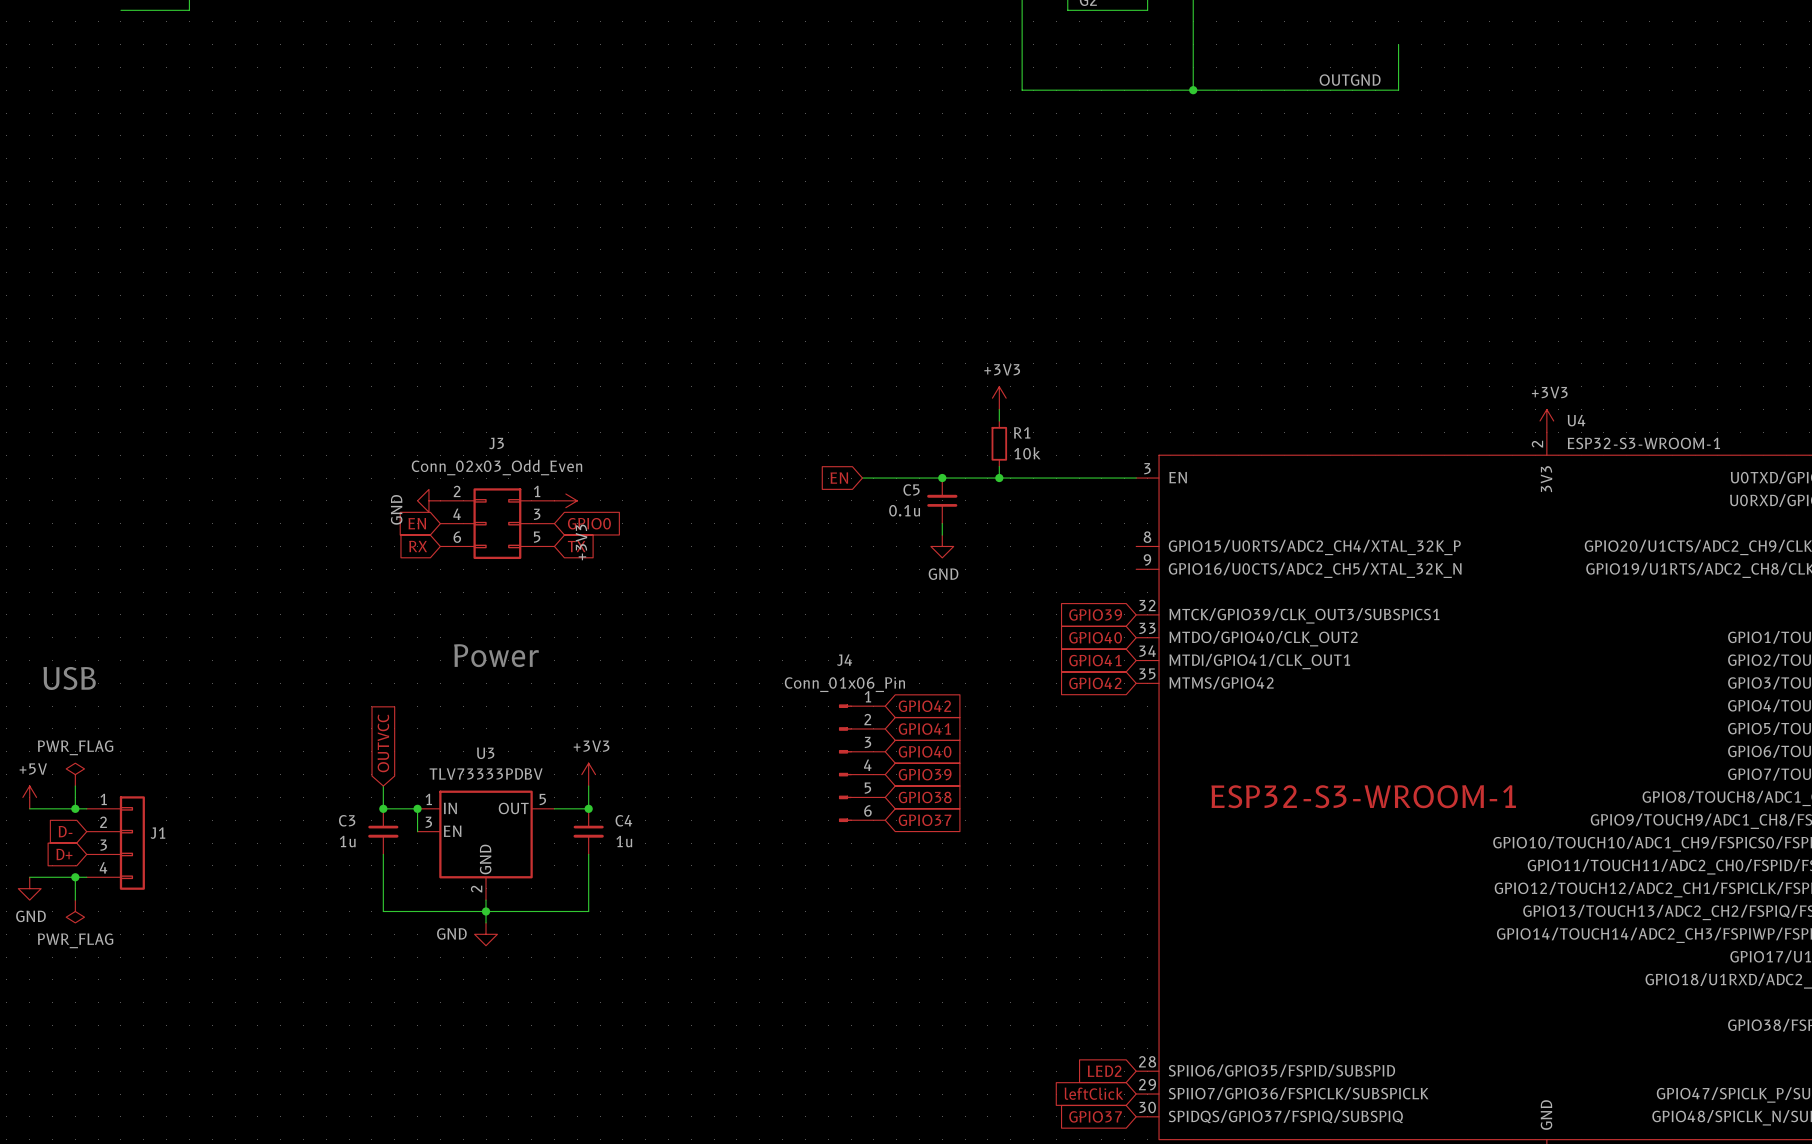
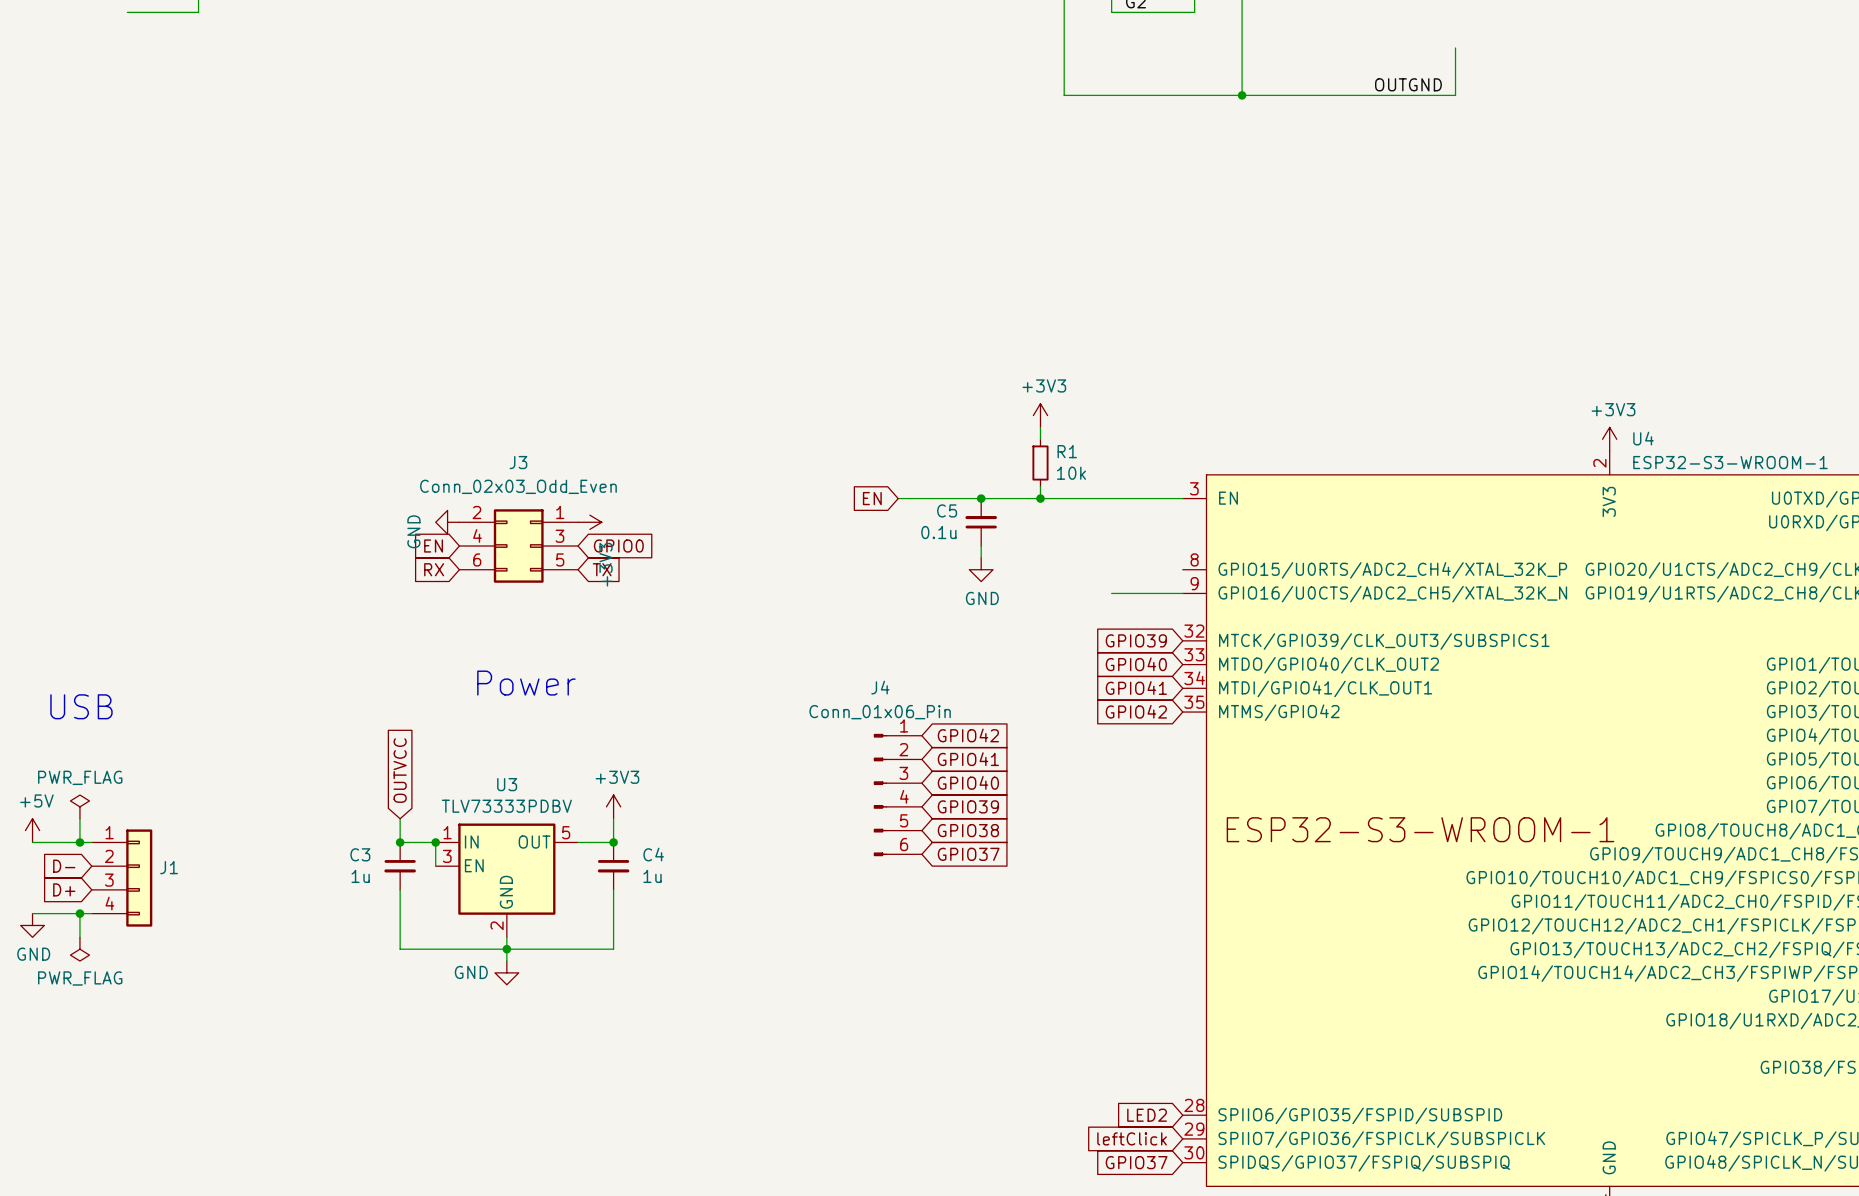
wire: none -> (1111, 593) (1182, 593)

